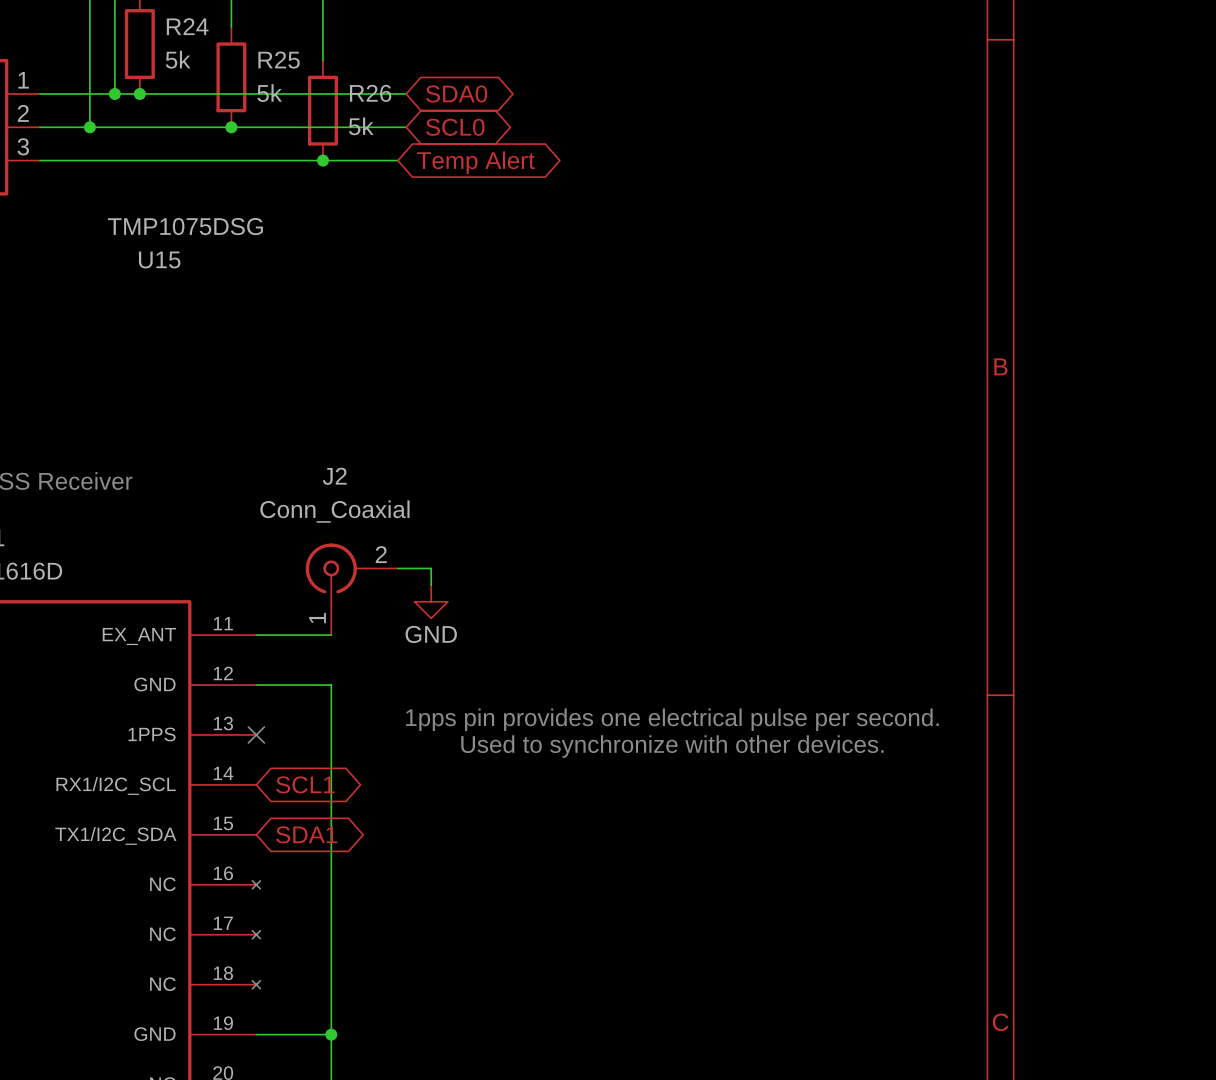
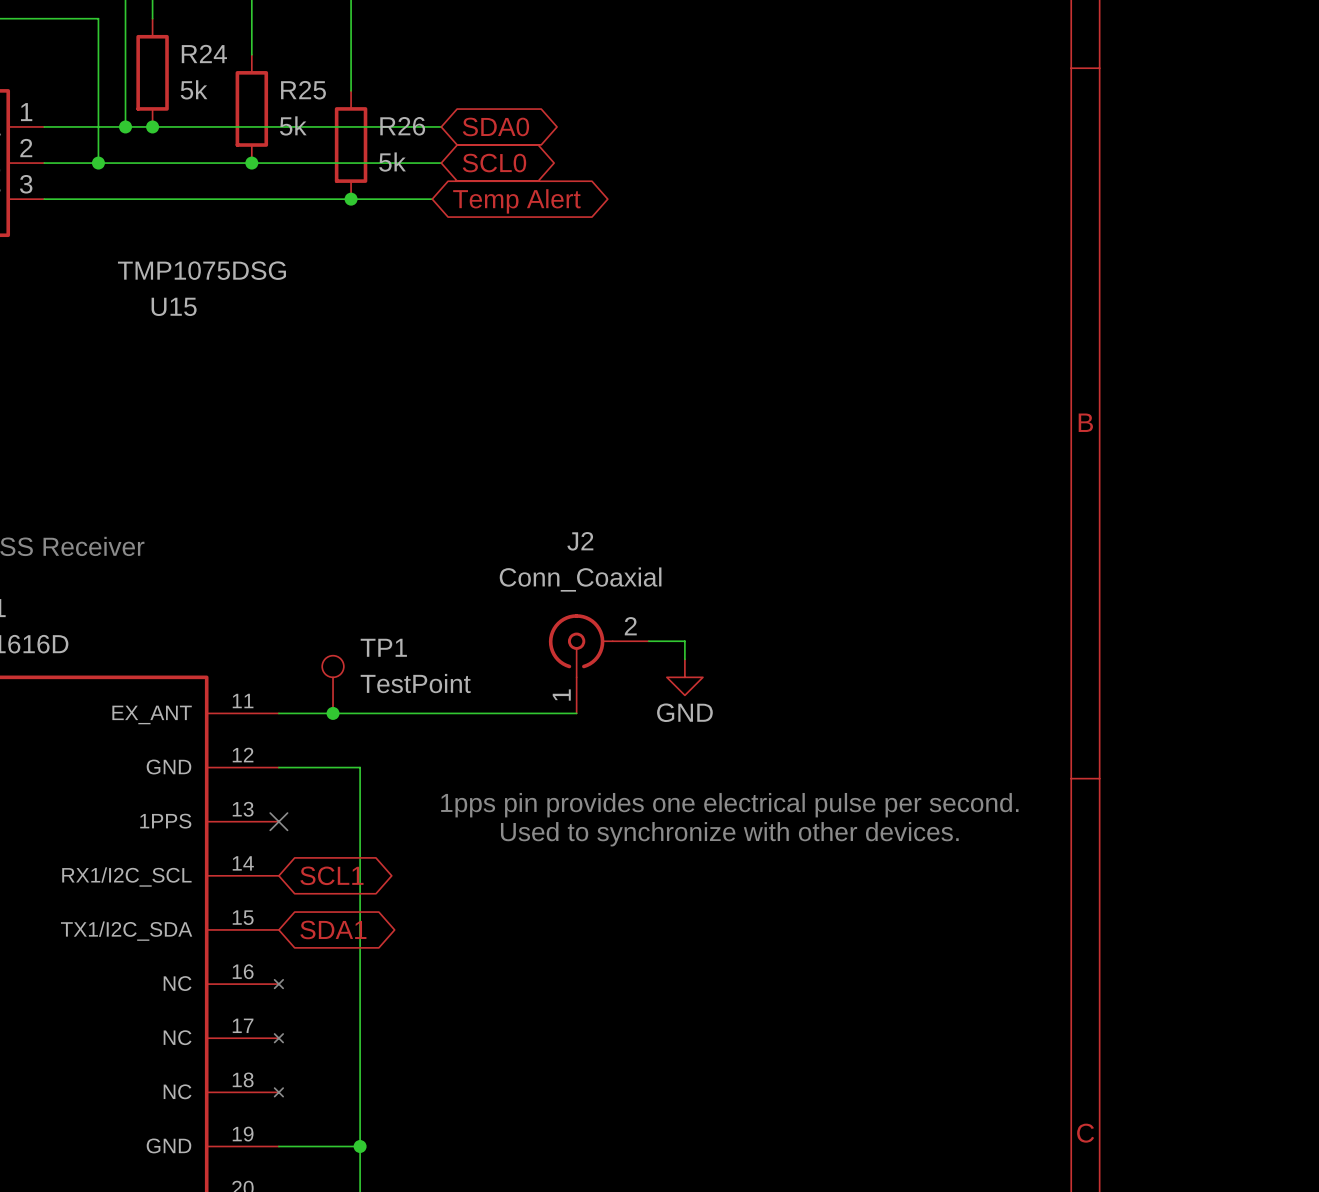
wire: (397, 568) (431, 568) (431, 585) -> (648, 641) (684, 641) (684, 659)
J2 position: (351, 589) -> (598, 663)
power symbol position: GND (431, 601) -> GND (684, 677)
TP1: none -> TestPoint (333, 684)
junction: none -> (333, 713)
wire: none -> (360, 713) (576, 713)

